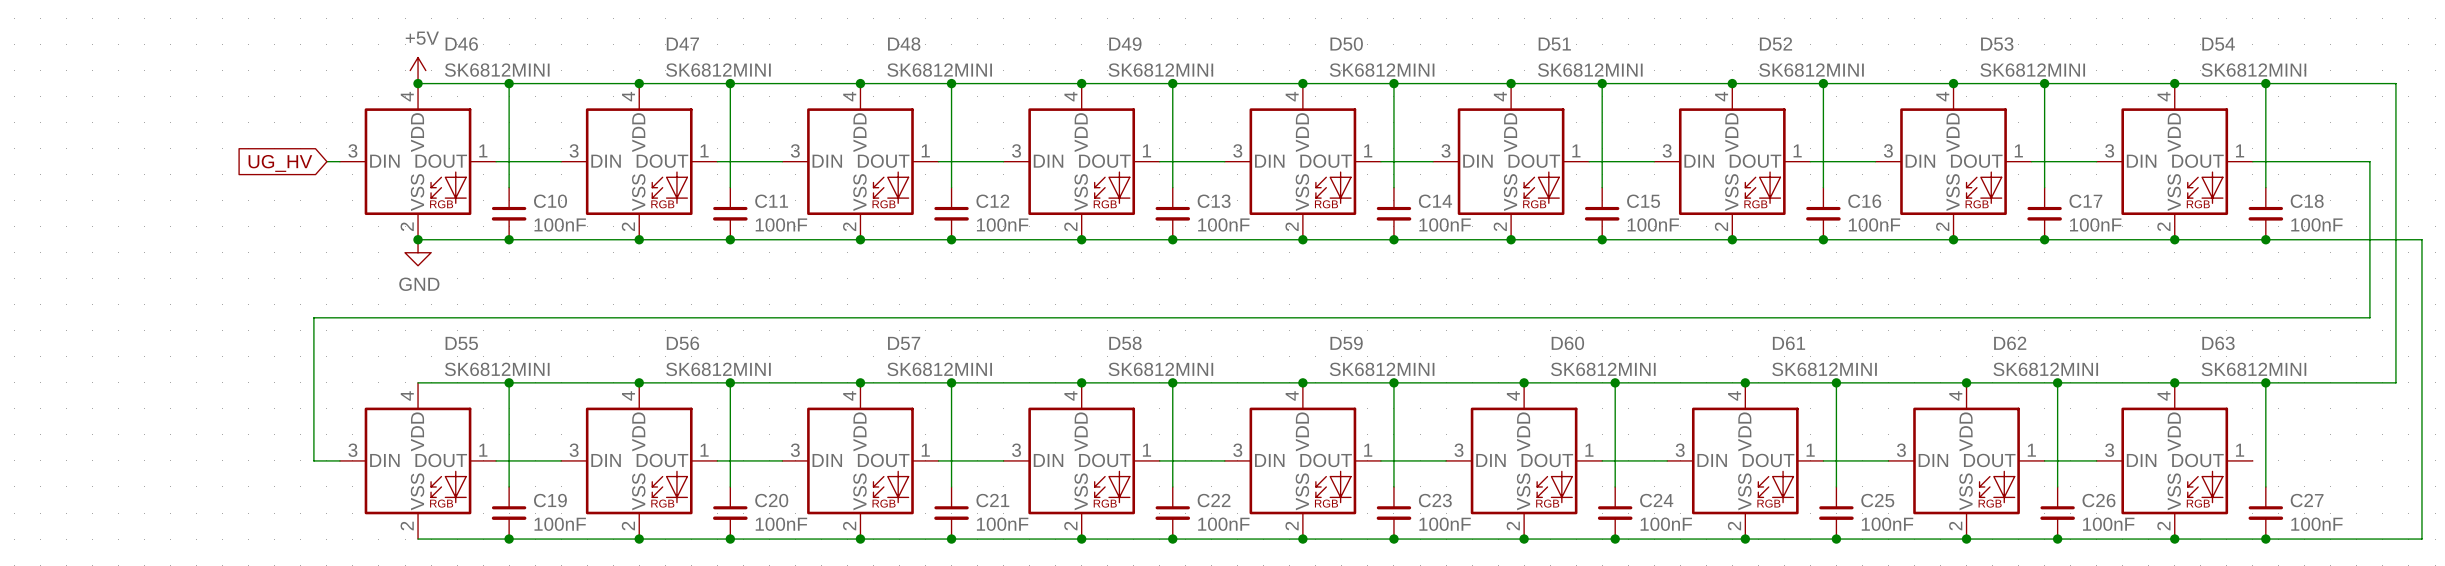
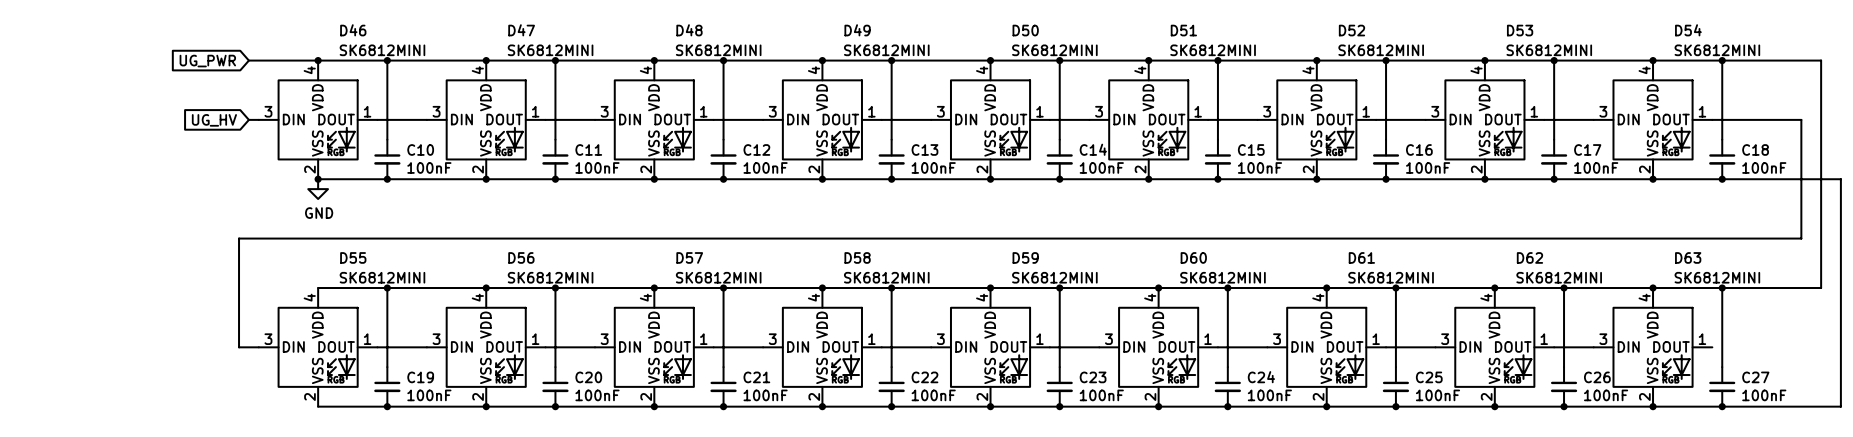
power symbol: +5V (418, 70) -> none
wire: none -> (248, 60) (318, 60)
global label: none -> UG_PWR (207, 61)

